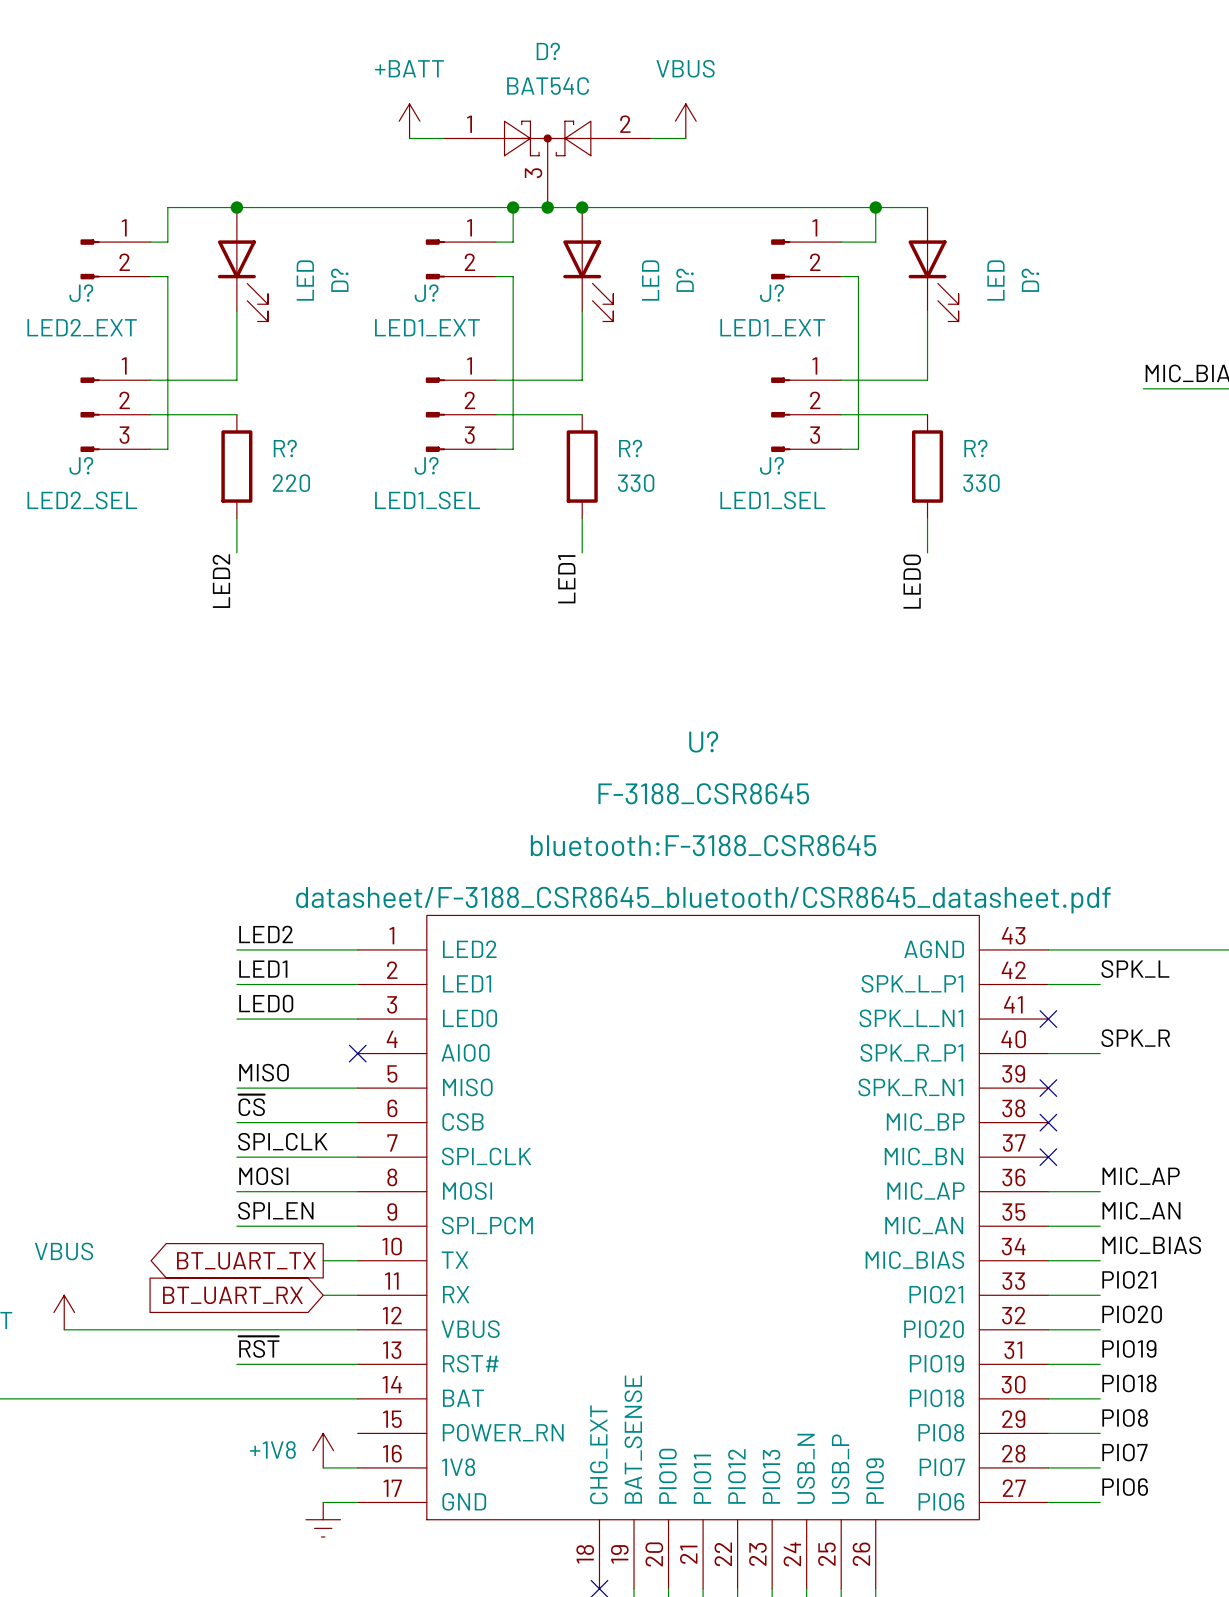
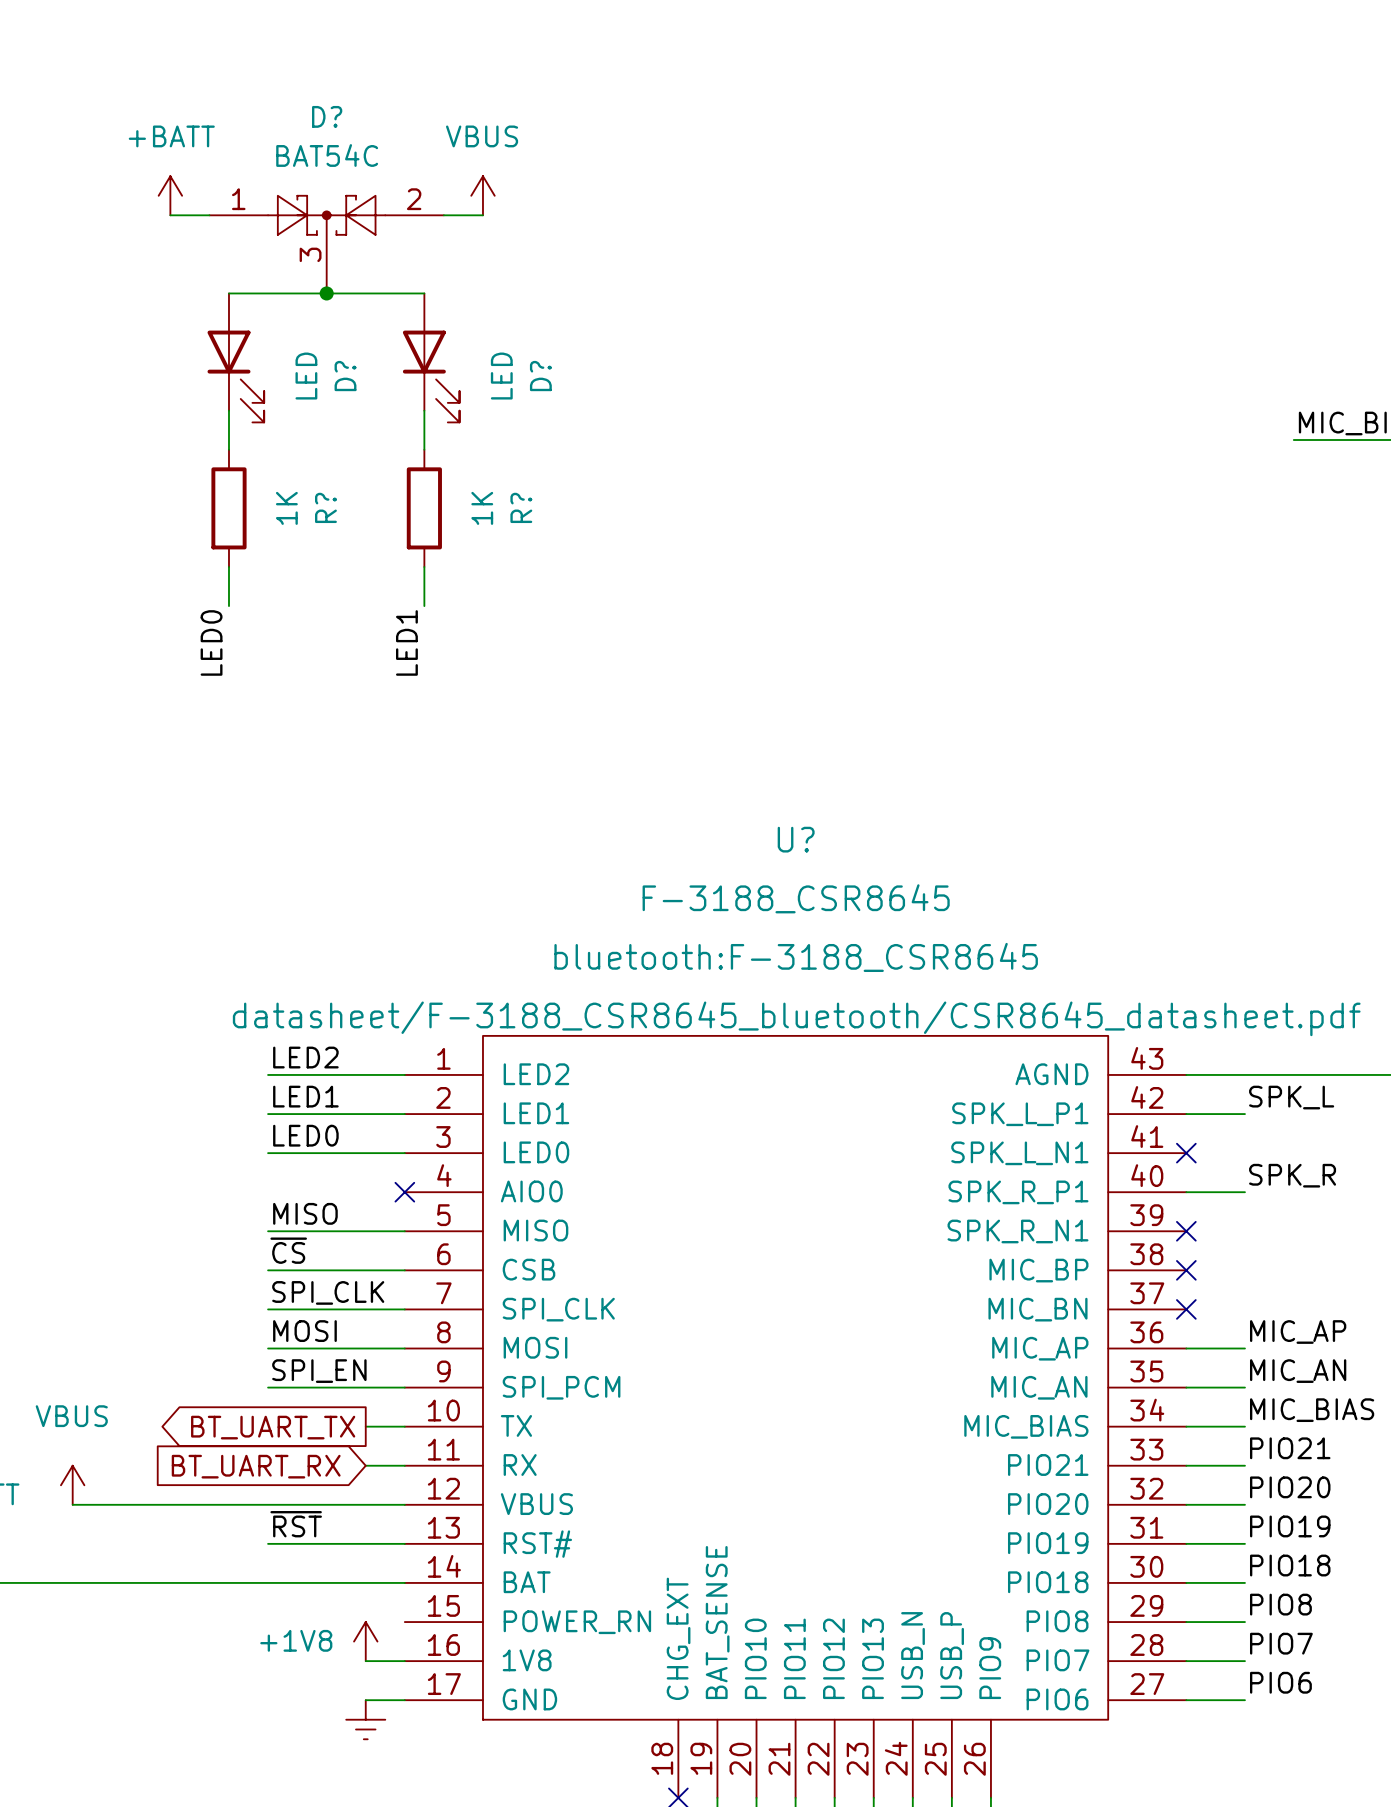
power symbol position: +BATT (409, 121) -> +BATT (170, 195)
power symbol position: VBUS (685, 121) -> VBUS (482, 195)
wire: (409, 138) (444, 138) -> (170, 215) (209, 215)
wire: (651, 138) (685, 138) -> (443, 215) (482, 215)
D? position: (547, 164) -> (326, 244)
junction position: (236, 207) -> (326, 293)
wire: (513, 207) (513, 242) (495, 242) -> none
junction: (513, 207) -> none
junction: (547, 207) -> none
junction: (582, 207) -> none
wire: (875, 207) (875, 242) (841, 242) -> none
junction: (875, 207) -> none
wire: (927, 207) (167, 207) (167, 242) (150, 242) -> none
J?: LED2_EXT (115, 259) -> none
wire: none -> (228, 293) (424, 293)
J?: LED1_EXT (460, 259) -> none
J?: LED1_EXT (806, 259) -> none
D? position: (242, 264) -> (235, 357)
D?: LED (588, 264) -> none
D?: LED (933, 264) -> none
wire: (150, 276) (167, 276) (167, 449) (150, 449) -> none
wire: (495, 276) (513, 276) (513, 449) (495, 449) -> none
wire: (841, 276) (858, 276) (858, 449) (841, 449) -> none
wire: (236, 311) (236, 380) (150, 380) -> none
wire: (582, 311) (582, 380) (495, 380) -> none
wire: (927, 311) (927, 380) (841, 380) -> none
D?: none -> LED (431, 357)
wire: none -> (228, 410) (228, 449)
wire: none -> (424, 410) (424, 449)
J?: LED2_SEL (115, 414) -> none
wire: (150, 414) (236, 414) -> none
J?: LED1_SEL (460, 414) -> none
wire: (495, 414) (582, 414) -> none
J?: LED1_SEL (806, 414) -> none
wire: (841, 414) (927, 414) -> none
R?: none -> 1K (228, 508)
R?: none -> 1K (424, 508)
R?: 220 (236, 466) -> none
R?: 330 (582, 466) -> none
R?: 330 (927, 466) -> none
wire: (236, 518) (236, 552) -> (228, 566) (228, 606)
wire: (582, 518) (582, 552) -> (424, 566) (424, 606)
wire: (927, 518) (927, 552) -> none
label position: LED1 (566, 579) -> LED1 (406, 642)
label: LED2 (221, 581) -> LED0 (211, 642)
label: LED0 (912, 581) -> none

